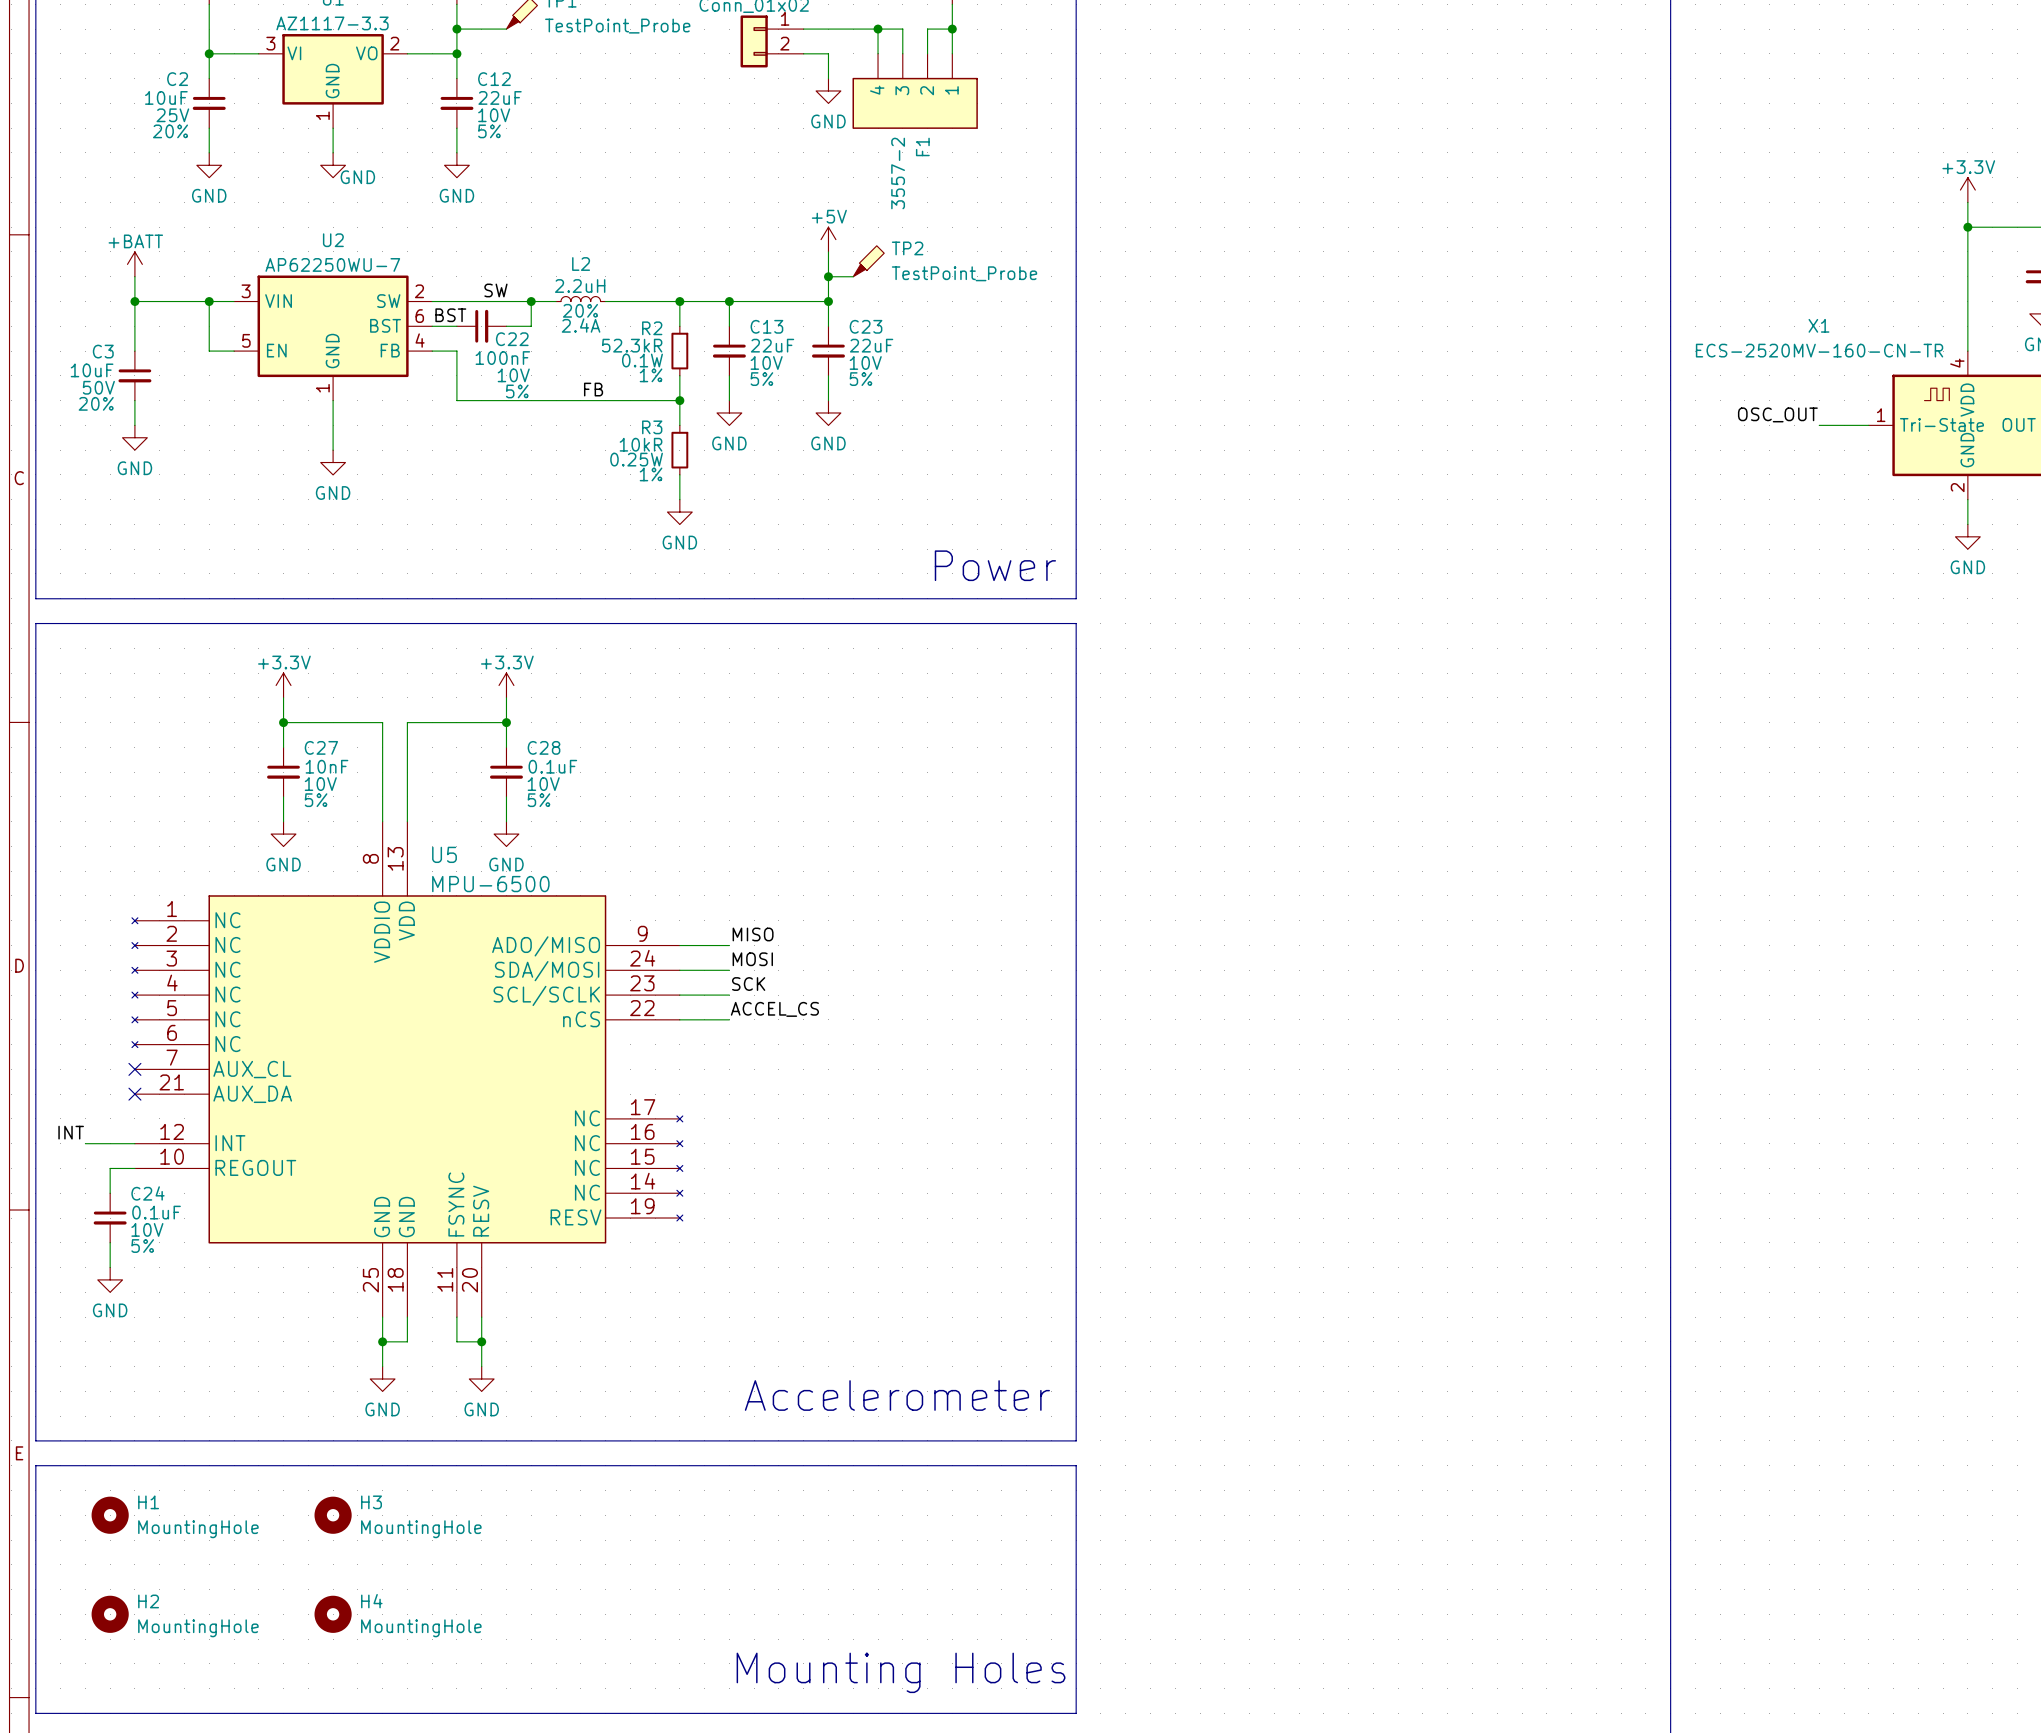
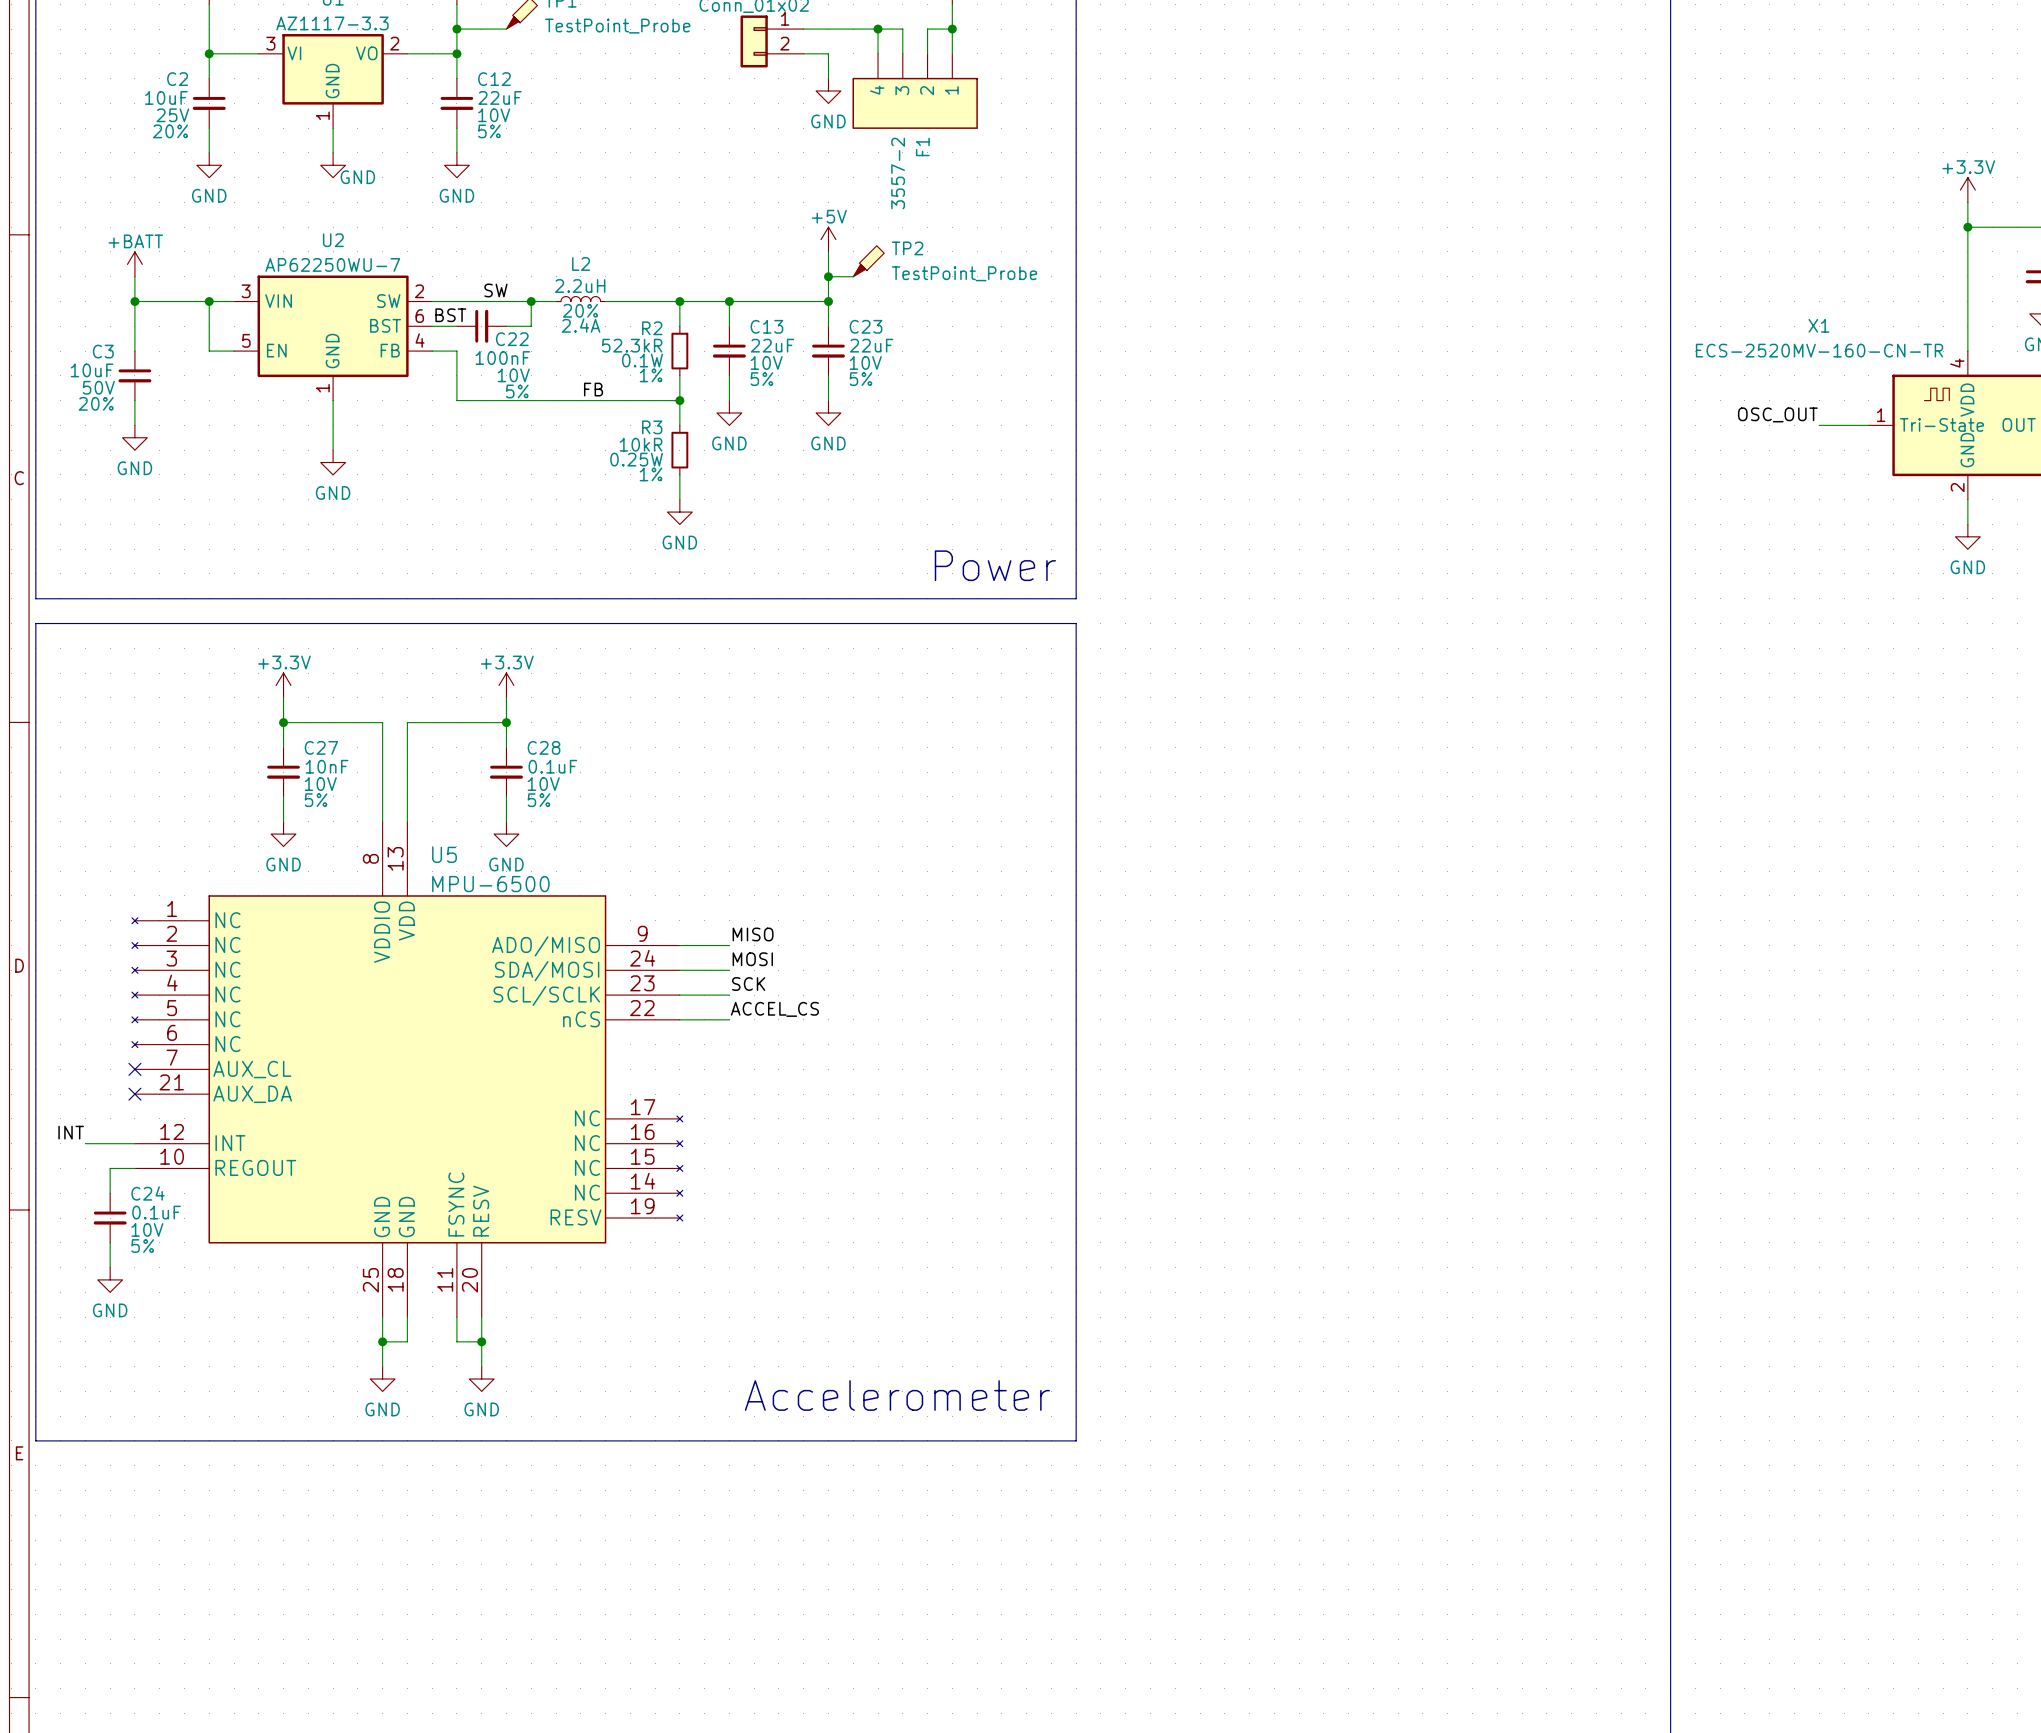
line: (35, 1465) (35, 1713) (1076, 1713) (1076, 1465) (35, 1465) -> none
H1: MountingHole (110, 1515) -> none
H3: MountingHole (333, 1515) -> none
H2: MountingHole (110, 1614) -> none
H4: MountingHole (333, 1614) -> none
text: Mounting Holes (901, 1672) -> none

